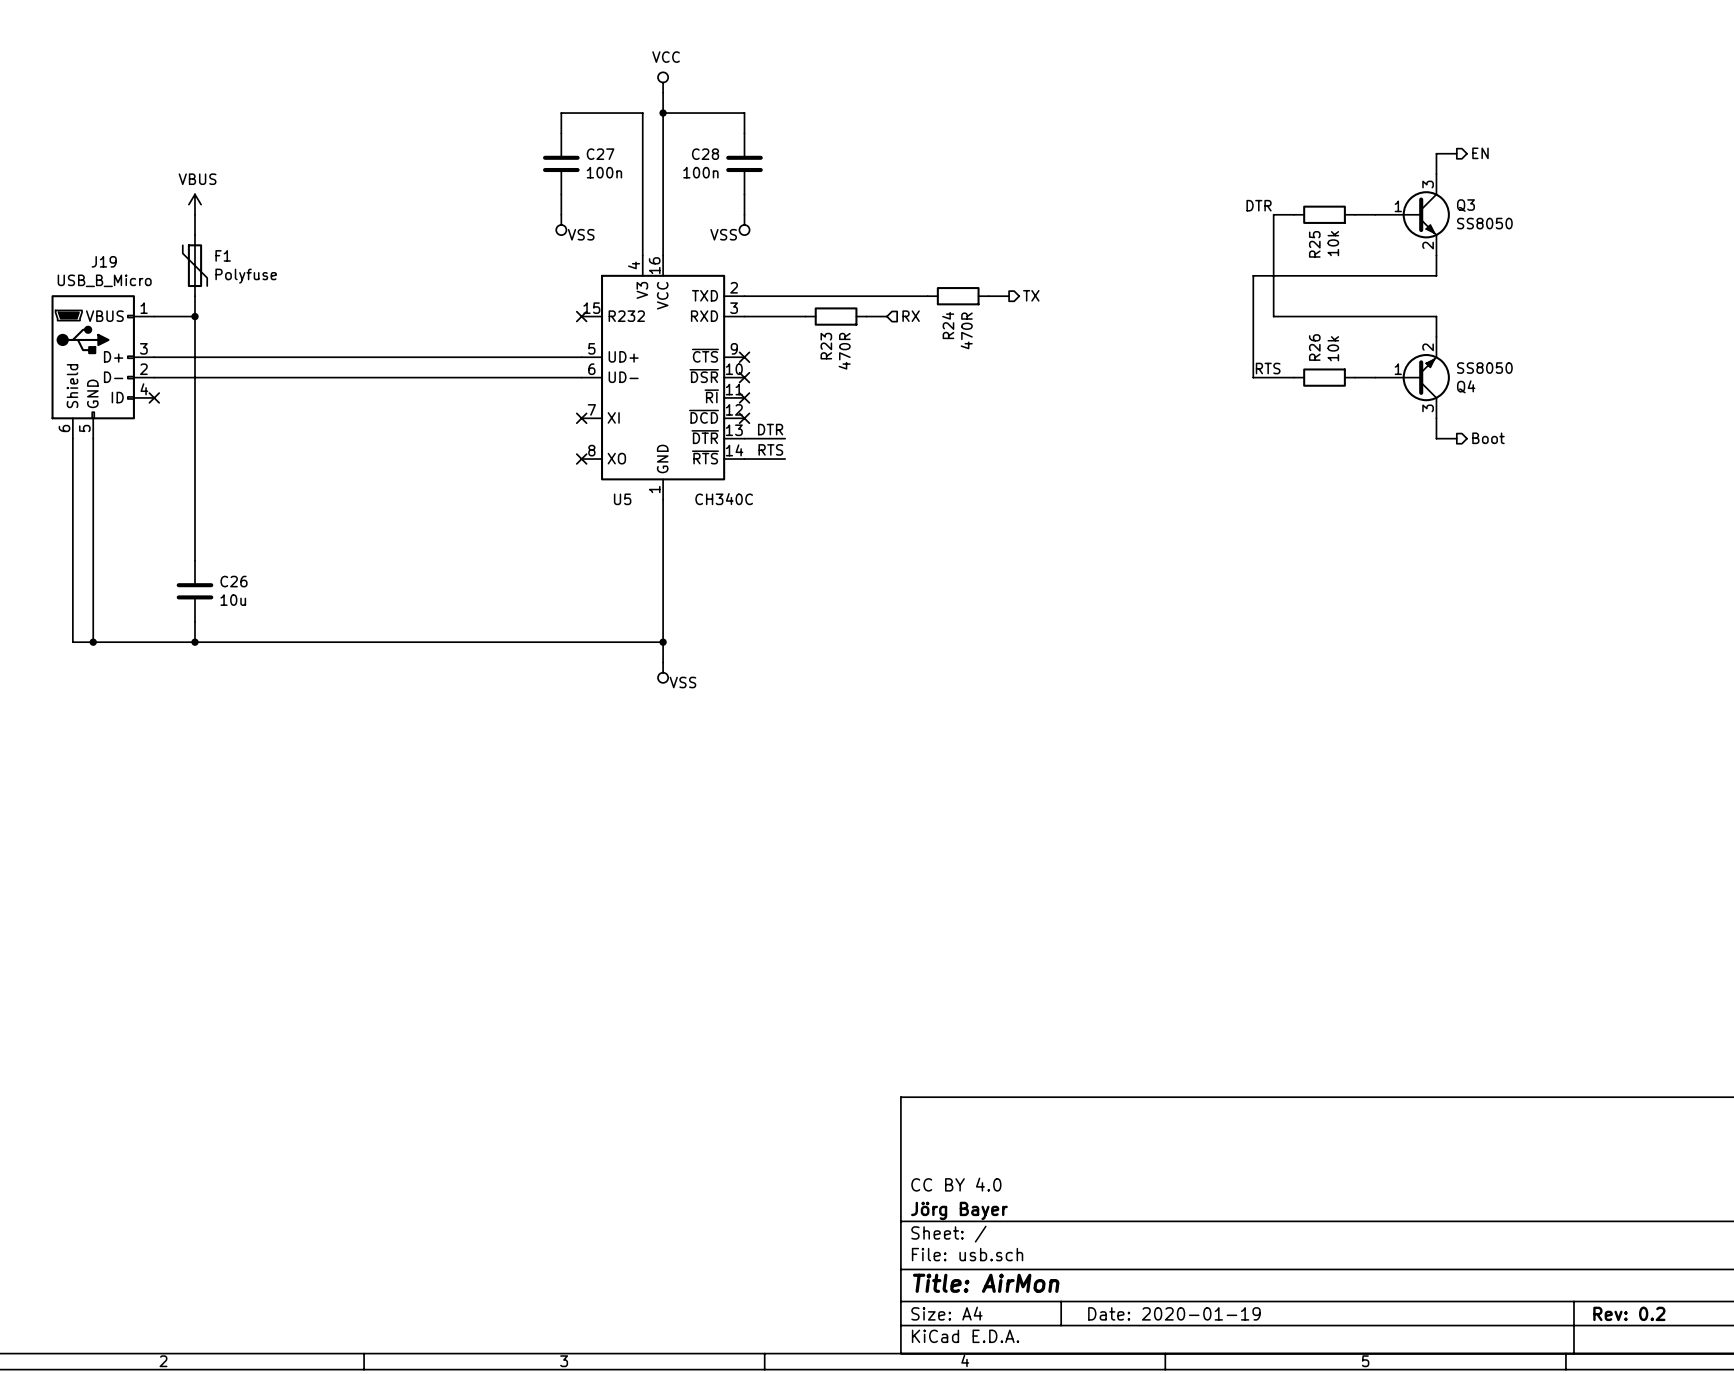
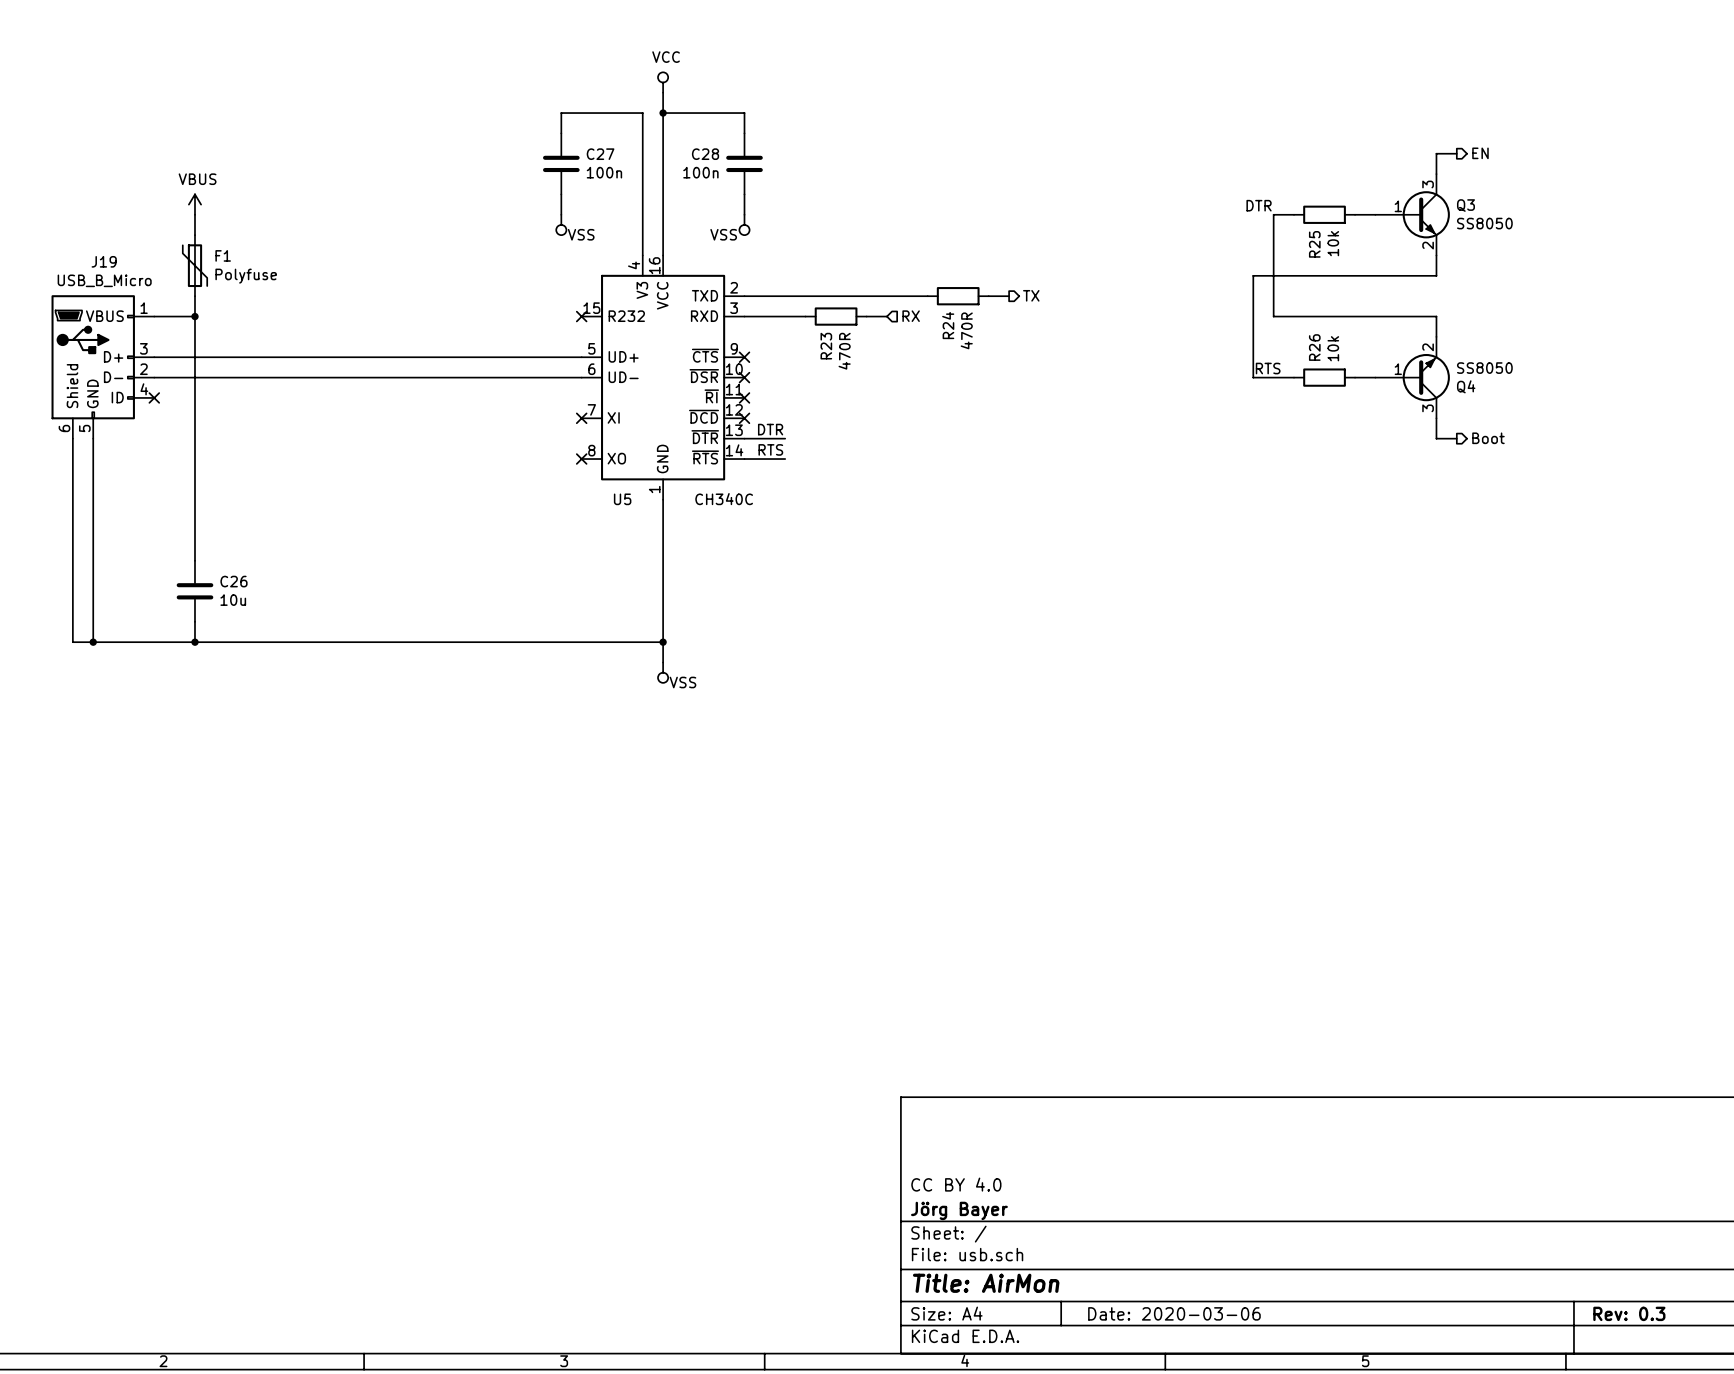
title block: Date: 2020-01-19 (1174, 1313) -> Date: 2020-03-06 (1174, 1313)
title block: Rev: 0.2 (1629, 1313) -> Rev: 0.3 (1629, 1313)

